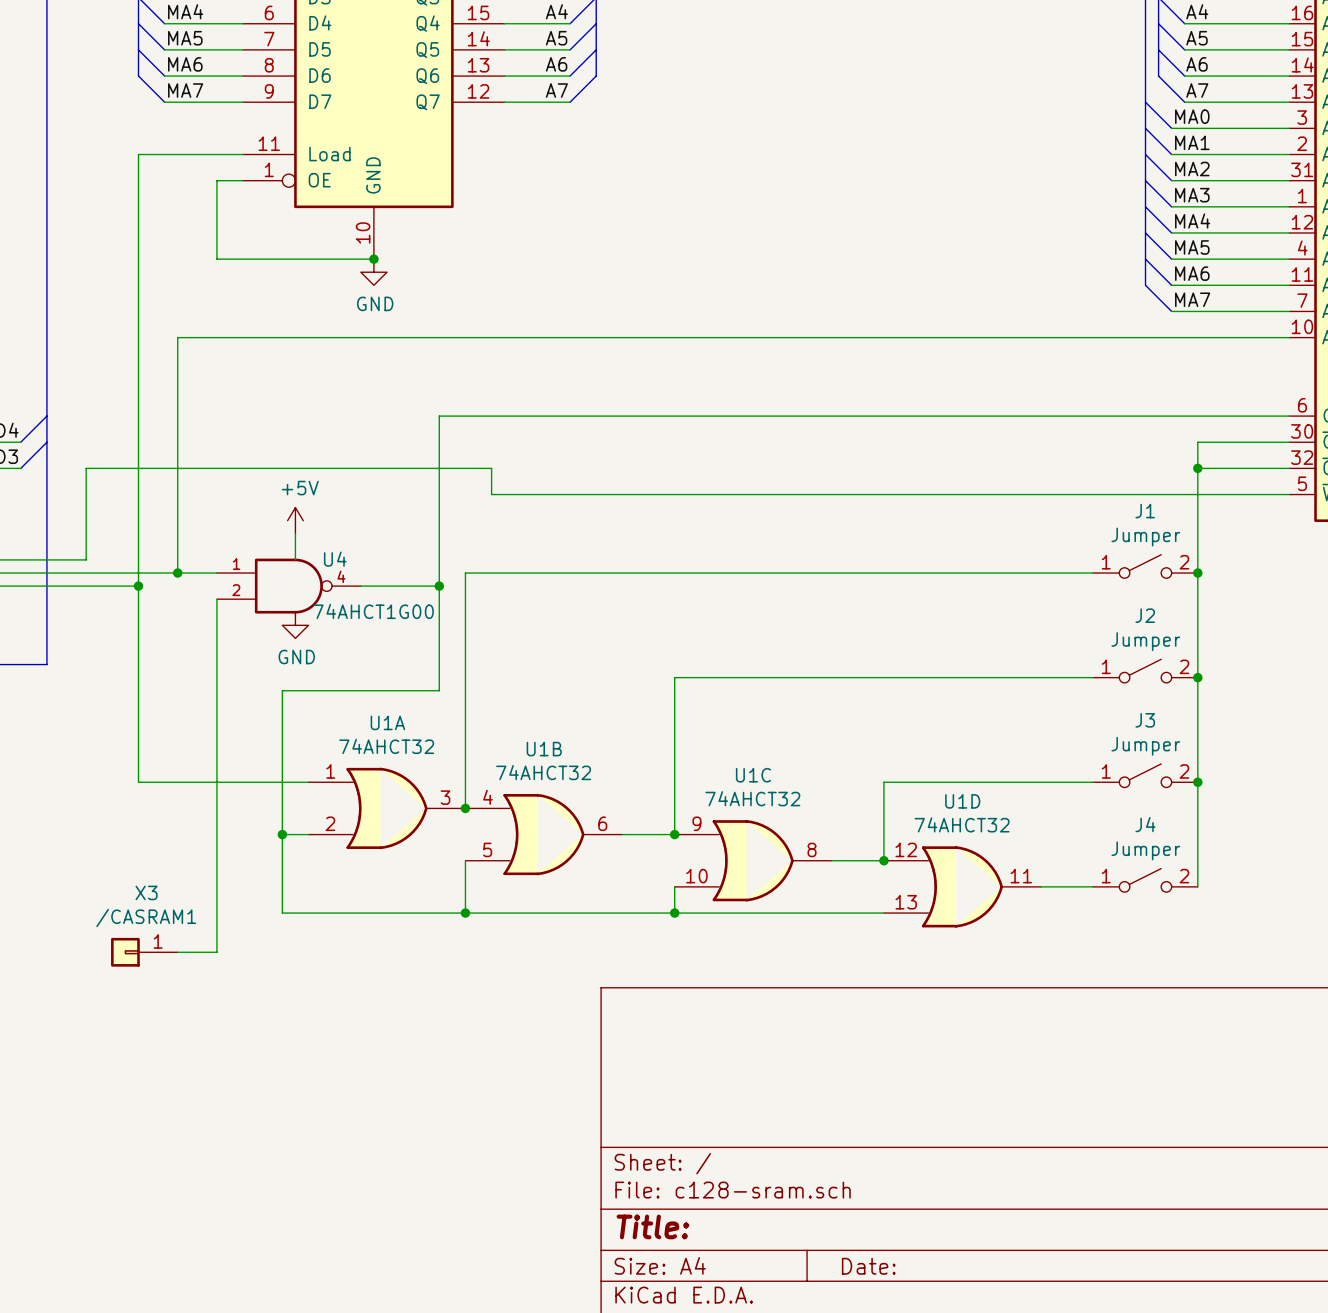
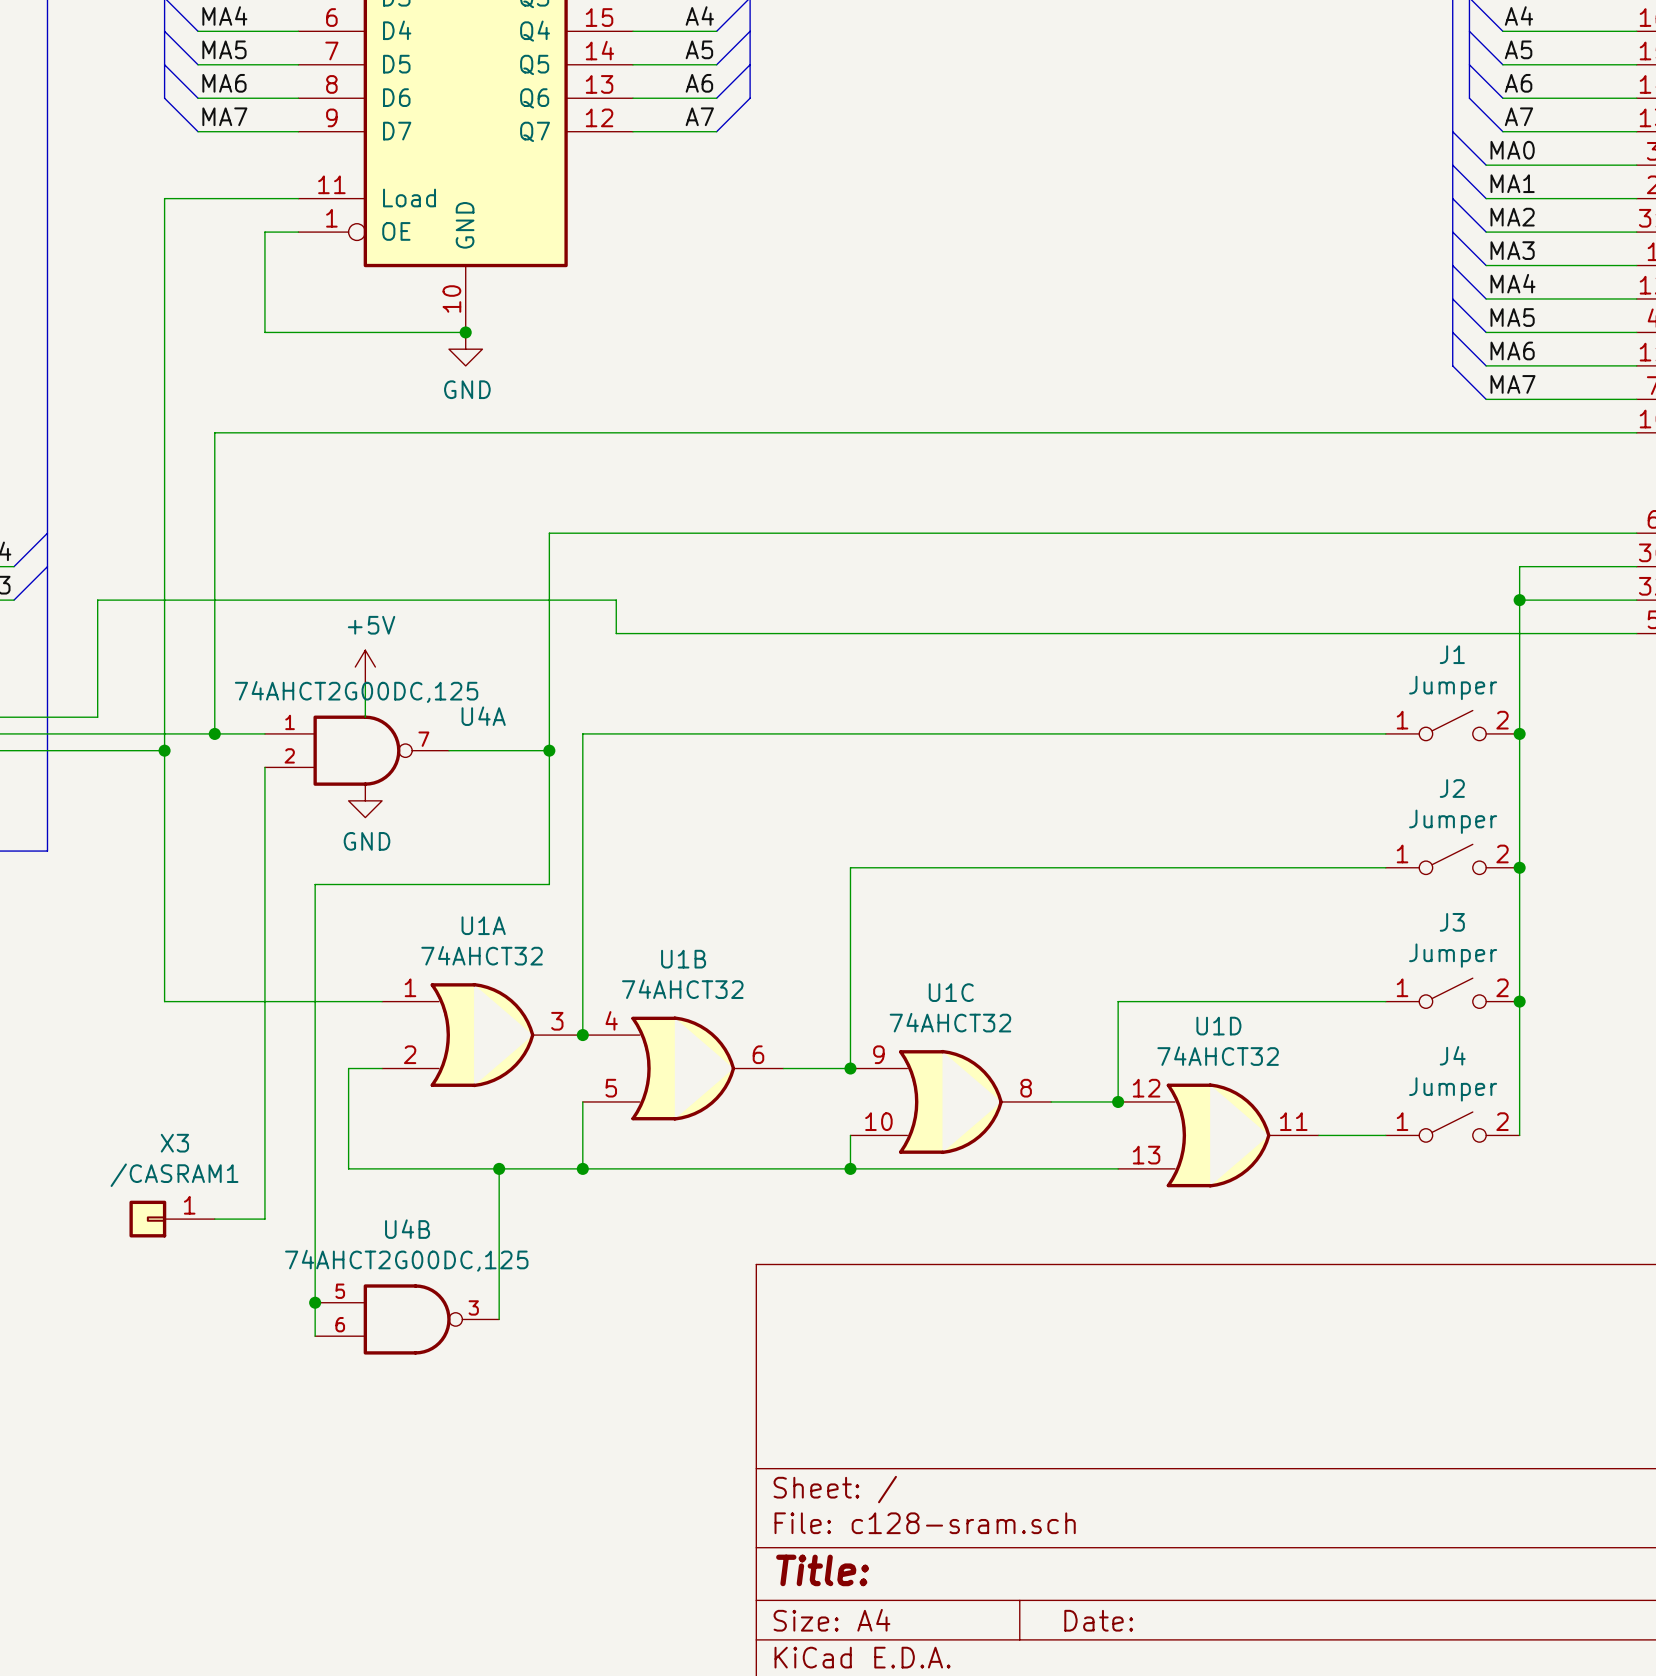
U4 name: U4 (335, 559) -> U4A (483, 716)
U4 pin number: 4 (341, 576) -> 7 (423, 739)
U4 value: 74AHCT1G00 (373, 611) -> 74AHCT2G00DC,125 (356, 691)
wire: (282, 690) (282, 834) -> (348, 884) (315, 884) (315, 1336)
junction: (282, 834) -> none
wire: none -> (499, 1168) (499, 1319)
junction: none -> (499, 1168)
junction: none -> (315, 1302)
U4B: none -> 74AHCT2G00DC,125 (407, 1319)

